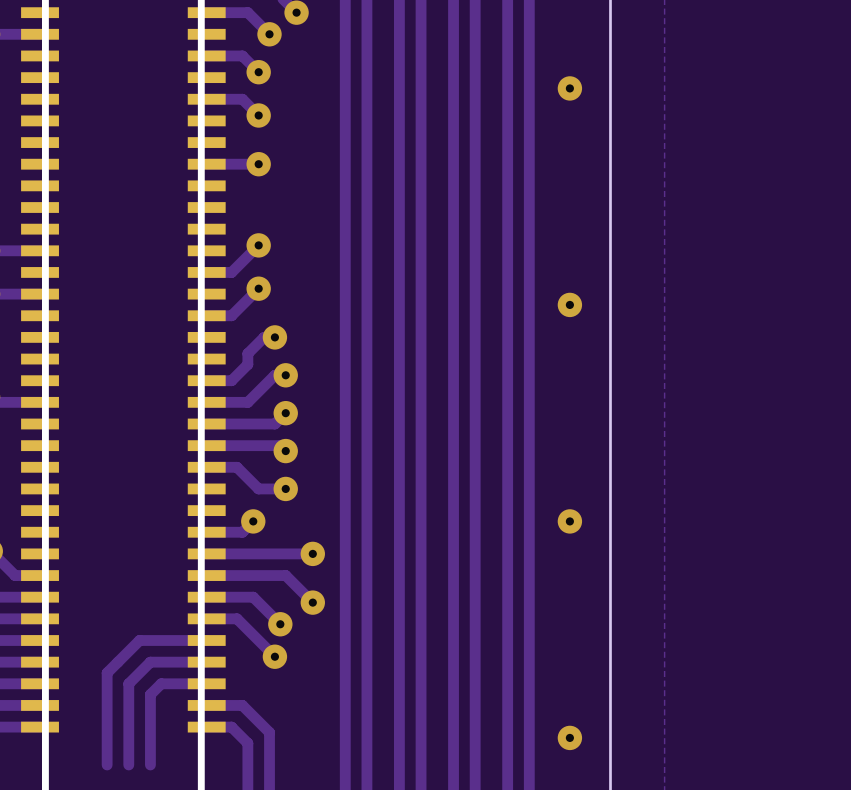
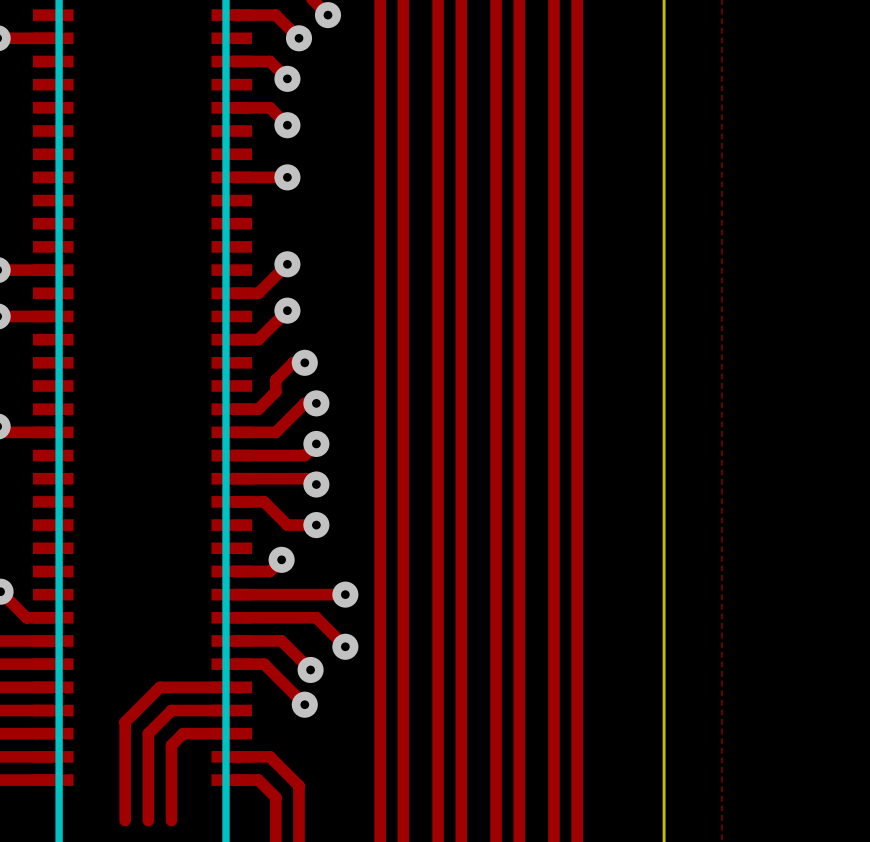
via: (569, 88) -> none
via: (569, 304) -> none
via: (569, 521) -> none
via: (569, 737) -> none

